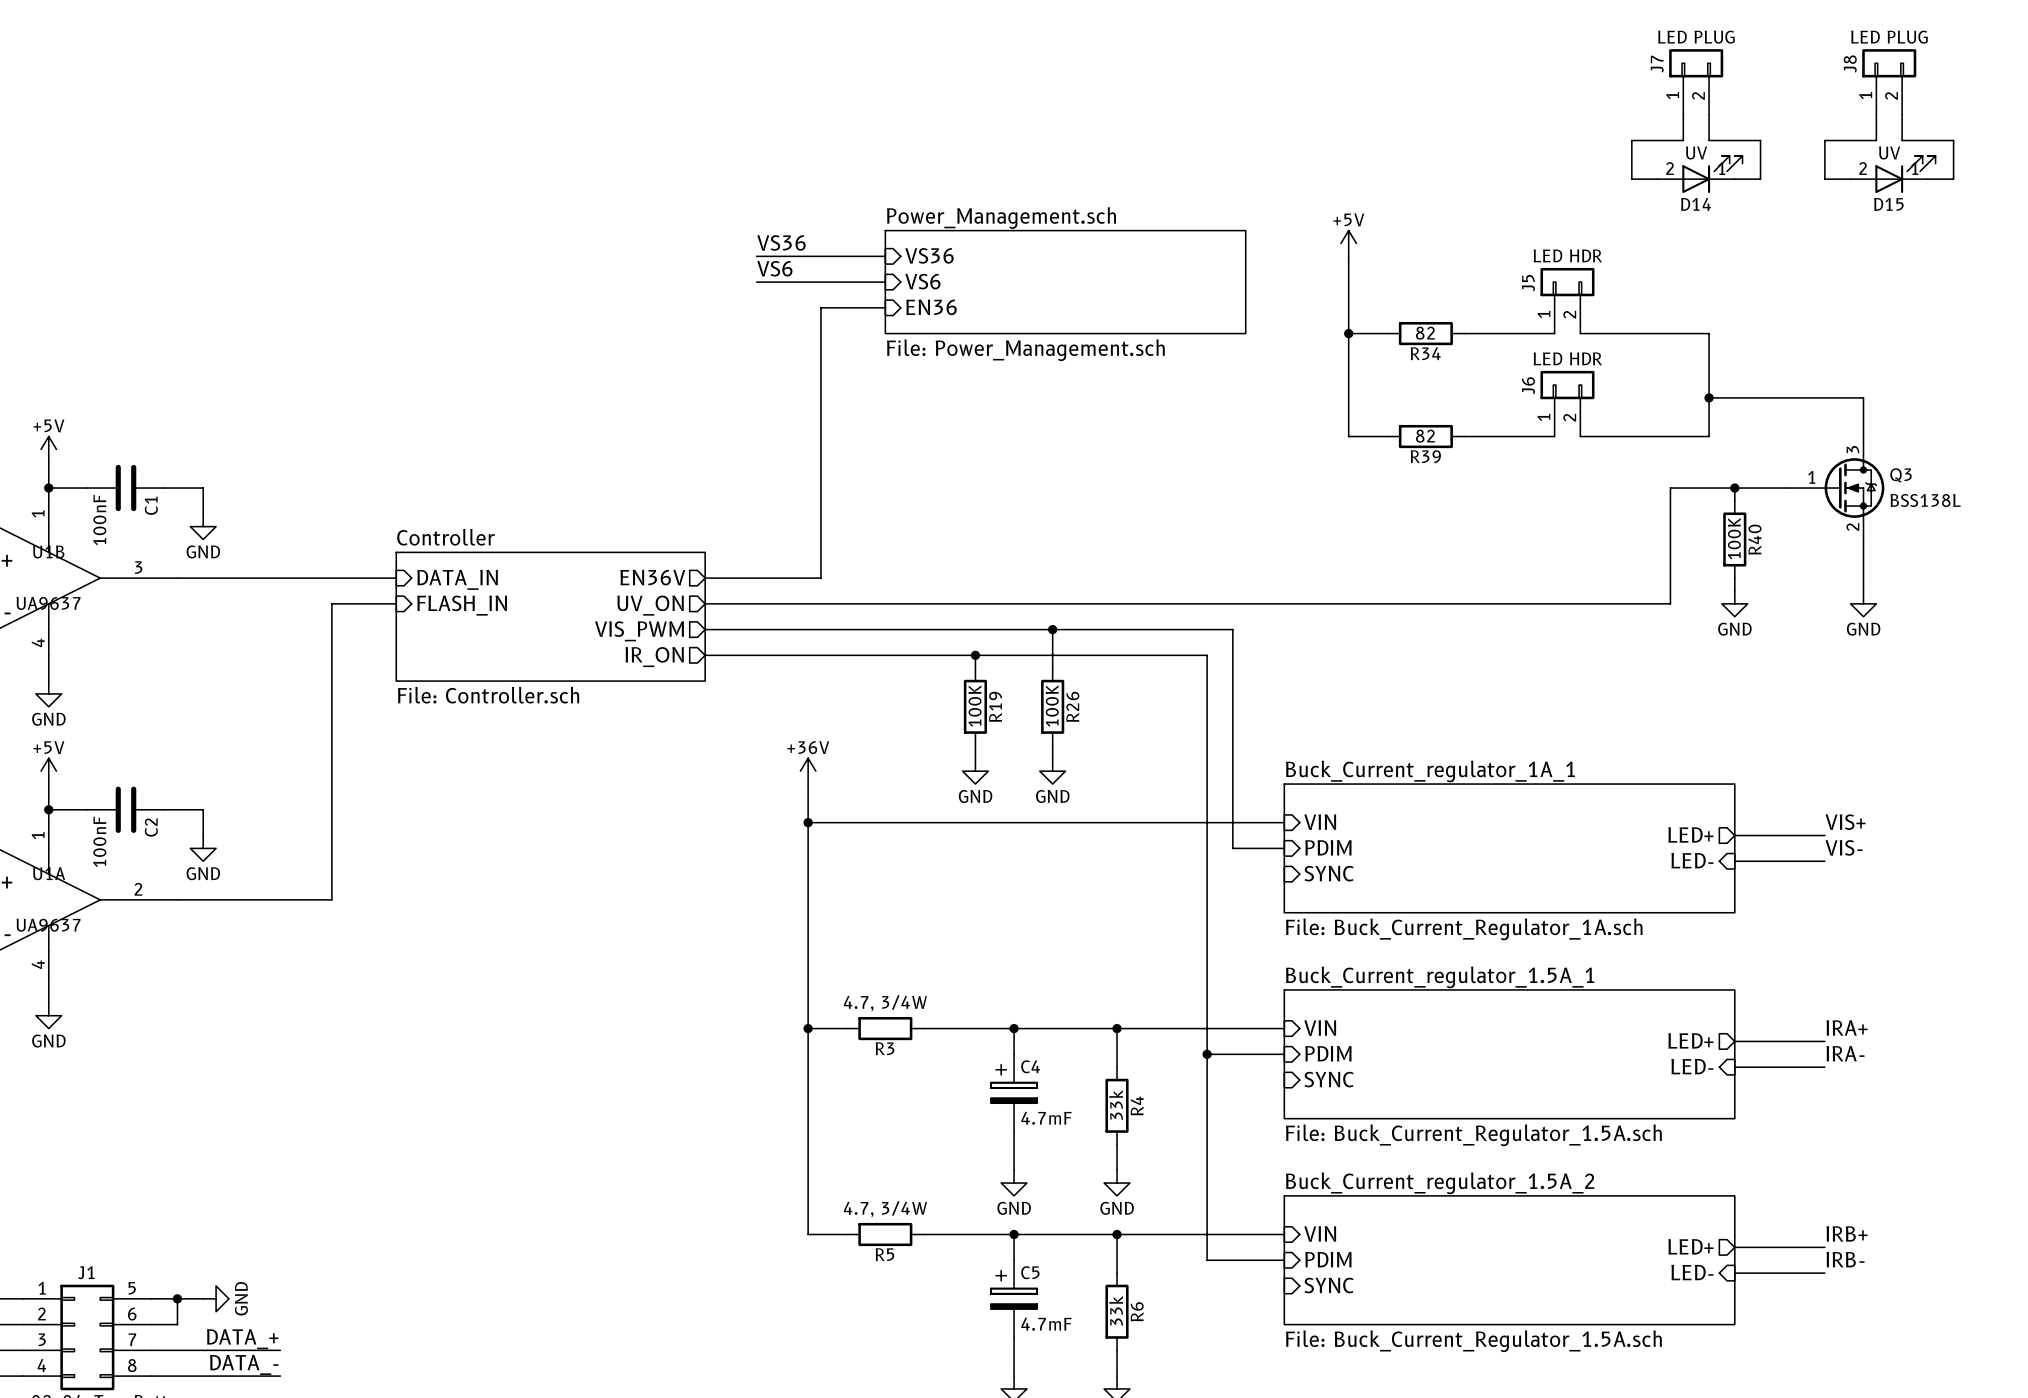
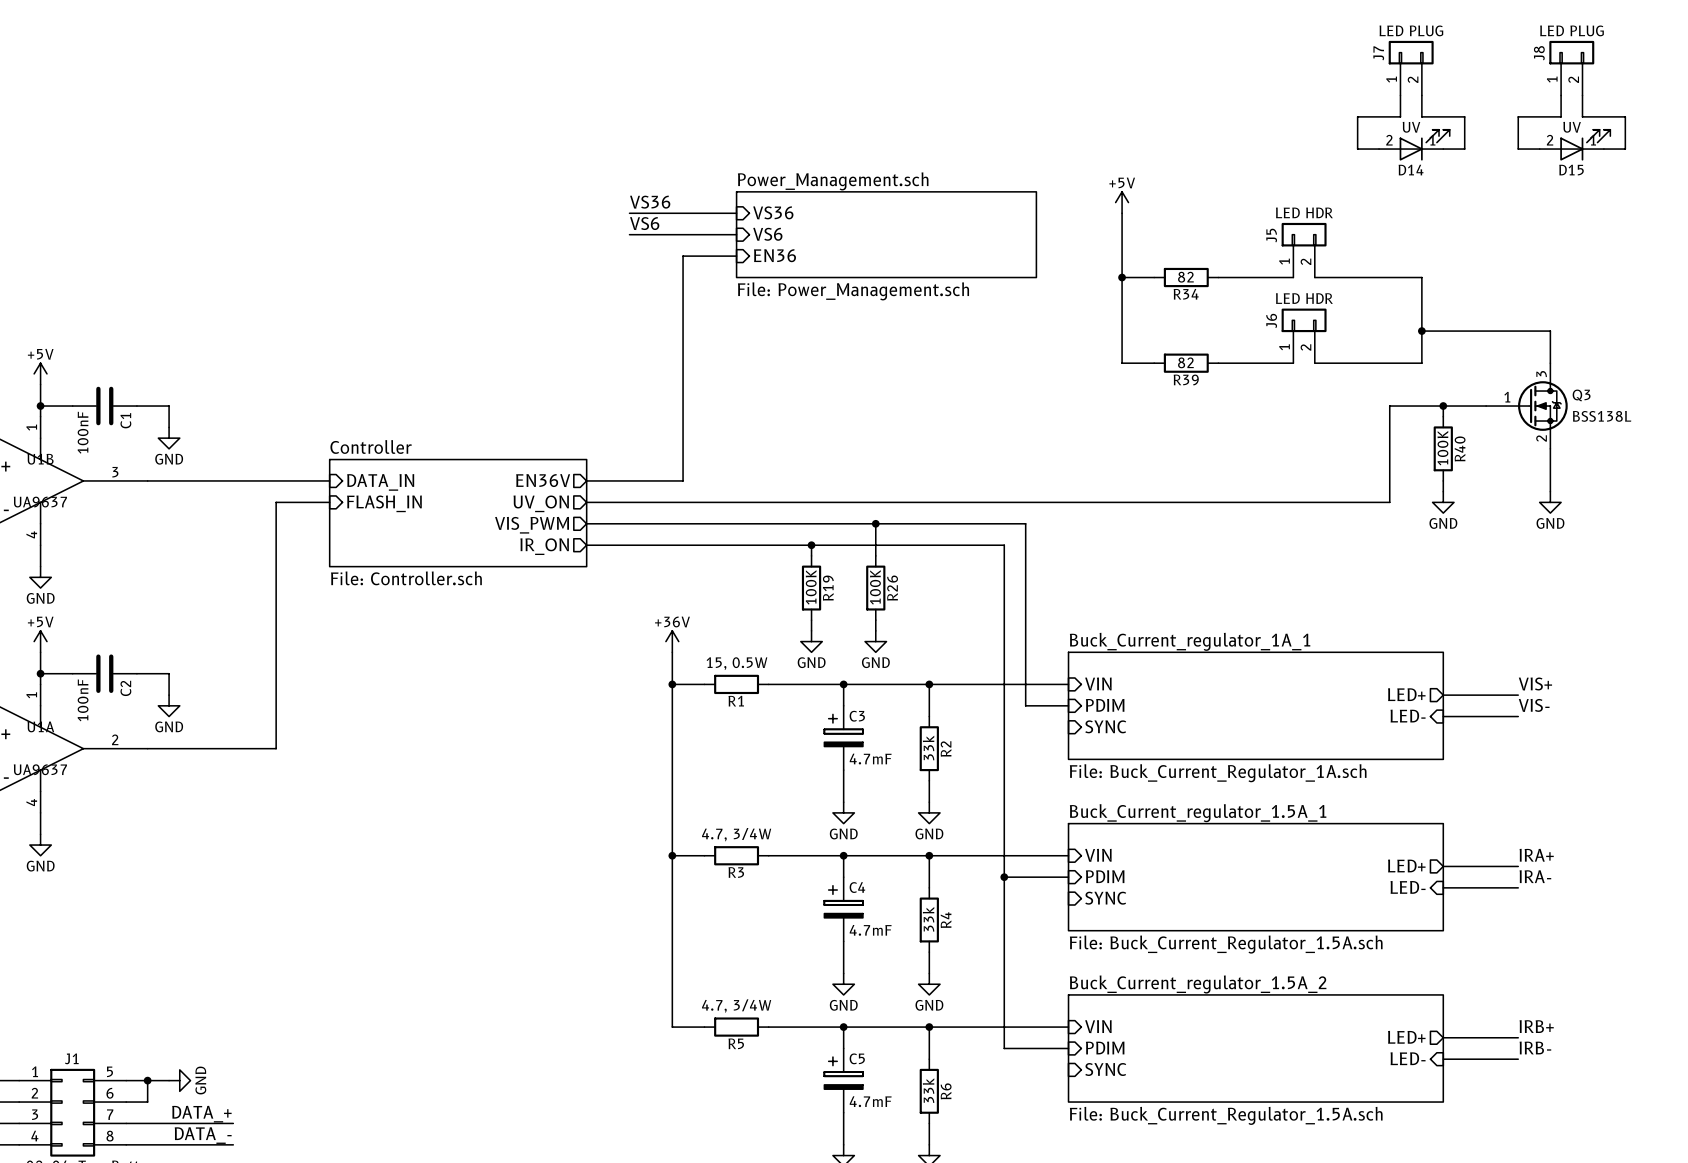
wire: (846, 822) (923, 822) -> none
R1: none -> 15, 0.5W (736, 684)
wire: none -> (843, 684) (843, 705)
junction: none -> (843, 684)
wire: none -> (929, 684) (929, 716)
junction: none -> (929, 684)
C3: none -> 4.7mF (843, 737)
R2: none -> 33k (929, 748)
wire: none -> (843, 770) (843, 802)
wire: none -> (929, 780) (929, 802)
power symbol: none -> GND (843, 812)
power symbol: none -> GND (929, 812)

